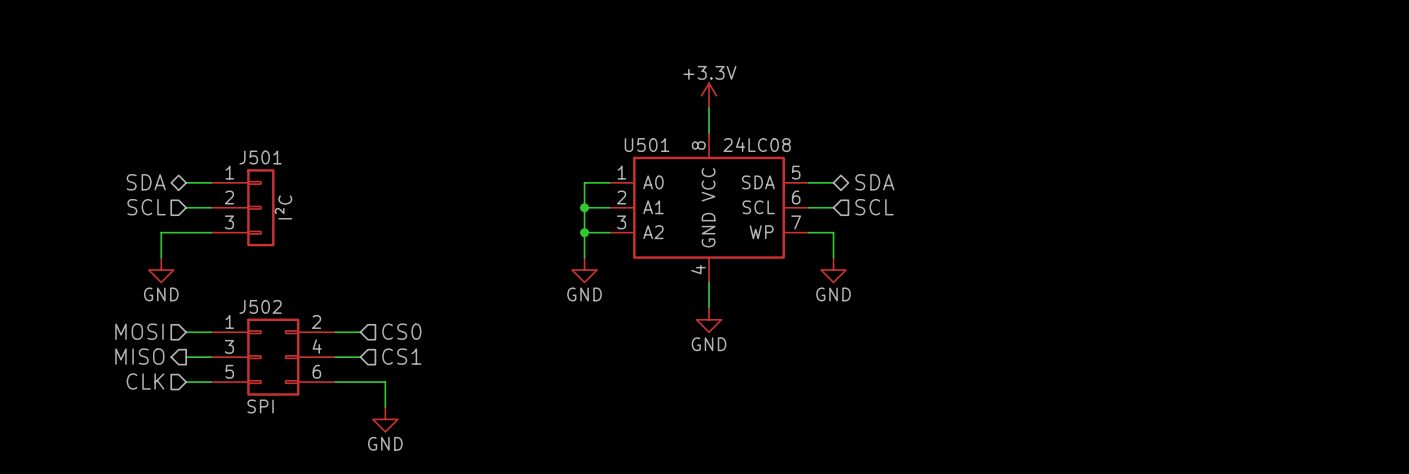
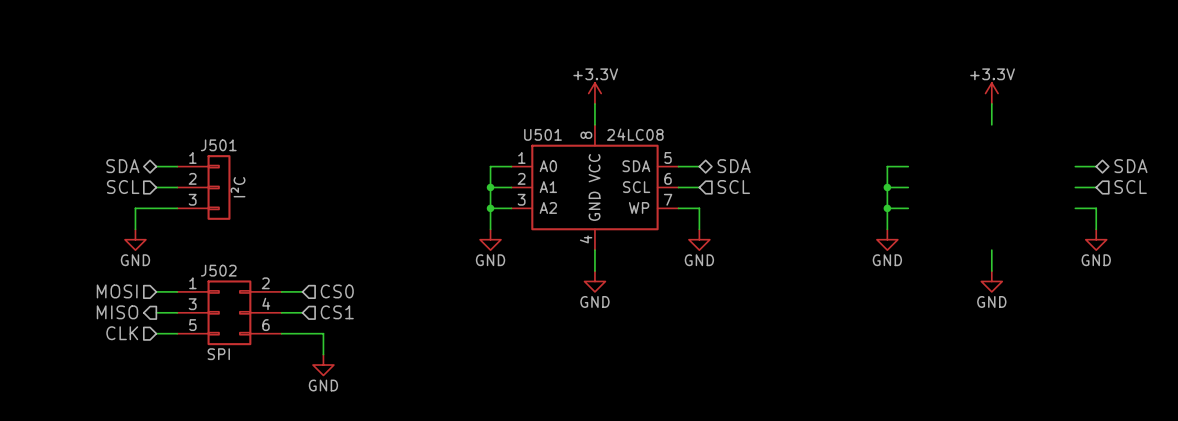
power symbol: none -> +3.3V (991, 93)
wire: none -> (991, 103) (991, 124)
wire: none -> (908, 166) (887, 166) (887, 229)
wire: none -> (1075, 166) (1096, 166)
hierarchical label: none -> SDA (1130, 166)
wire: none -> (887, 187) (908, 187)
junction: none -> (887, 187)
wire: none -> (1075, 187) (1096, 187)
hierarchical label: none -> SCL (1130, 187)
wire: none -> (887, 208) (908, 208)
junction: none -> (887, 208)
wire: none -> (1075, 208) (1096, 208) (1096, 229)
power symbol: none -> GND (887, 239)
power symbol: none -> GND (1096, 239)
wire: none -> (991, 250) (991, 271)
power symbol: none -> GND (991, 281)

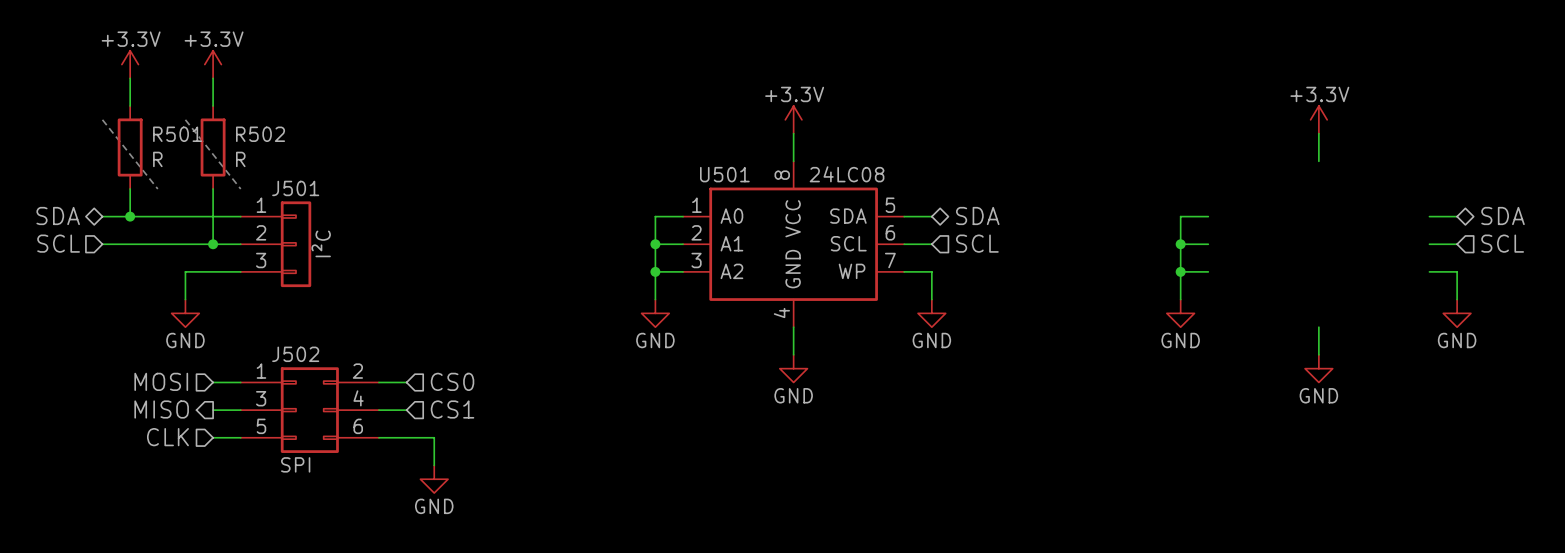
power symbol: none -> +3.3V (130, 64)
power symbol: none -> +3.3V (213, 64)
wire: none -> (130, 78) (130, 106)
wire: none -> (213, 78) (213, 106)
line: none -> (102, 119) (157, 188)
line: none -> (185, 119) (240, 188)
R501: none -> R (130, 147)
R502: none -> R (213, 147)
wire: none -> (130, 188) (130, 216)
wire: none -> (213, 188) (213, 244) (102, 244)
wire: none -> (102, 216) (213, 216)
junction: none -> (130, 216)
hierarchical label position: SDA (122, 166) -> SDA (58, 215)
hierarchical label position: SCL (123, 187) -> SCL (58, 243)
junction: none -> (213, 244)

